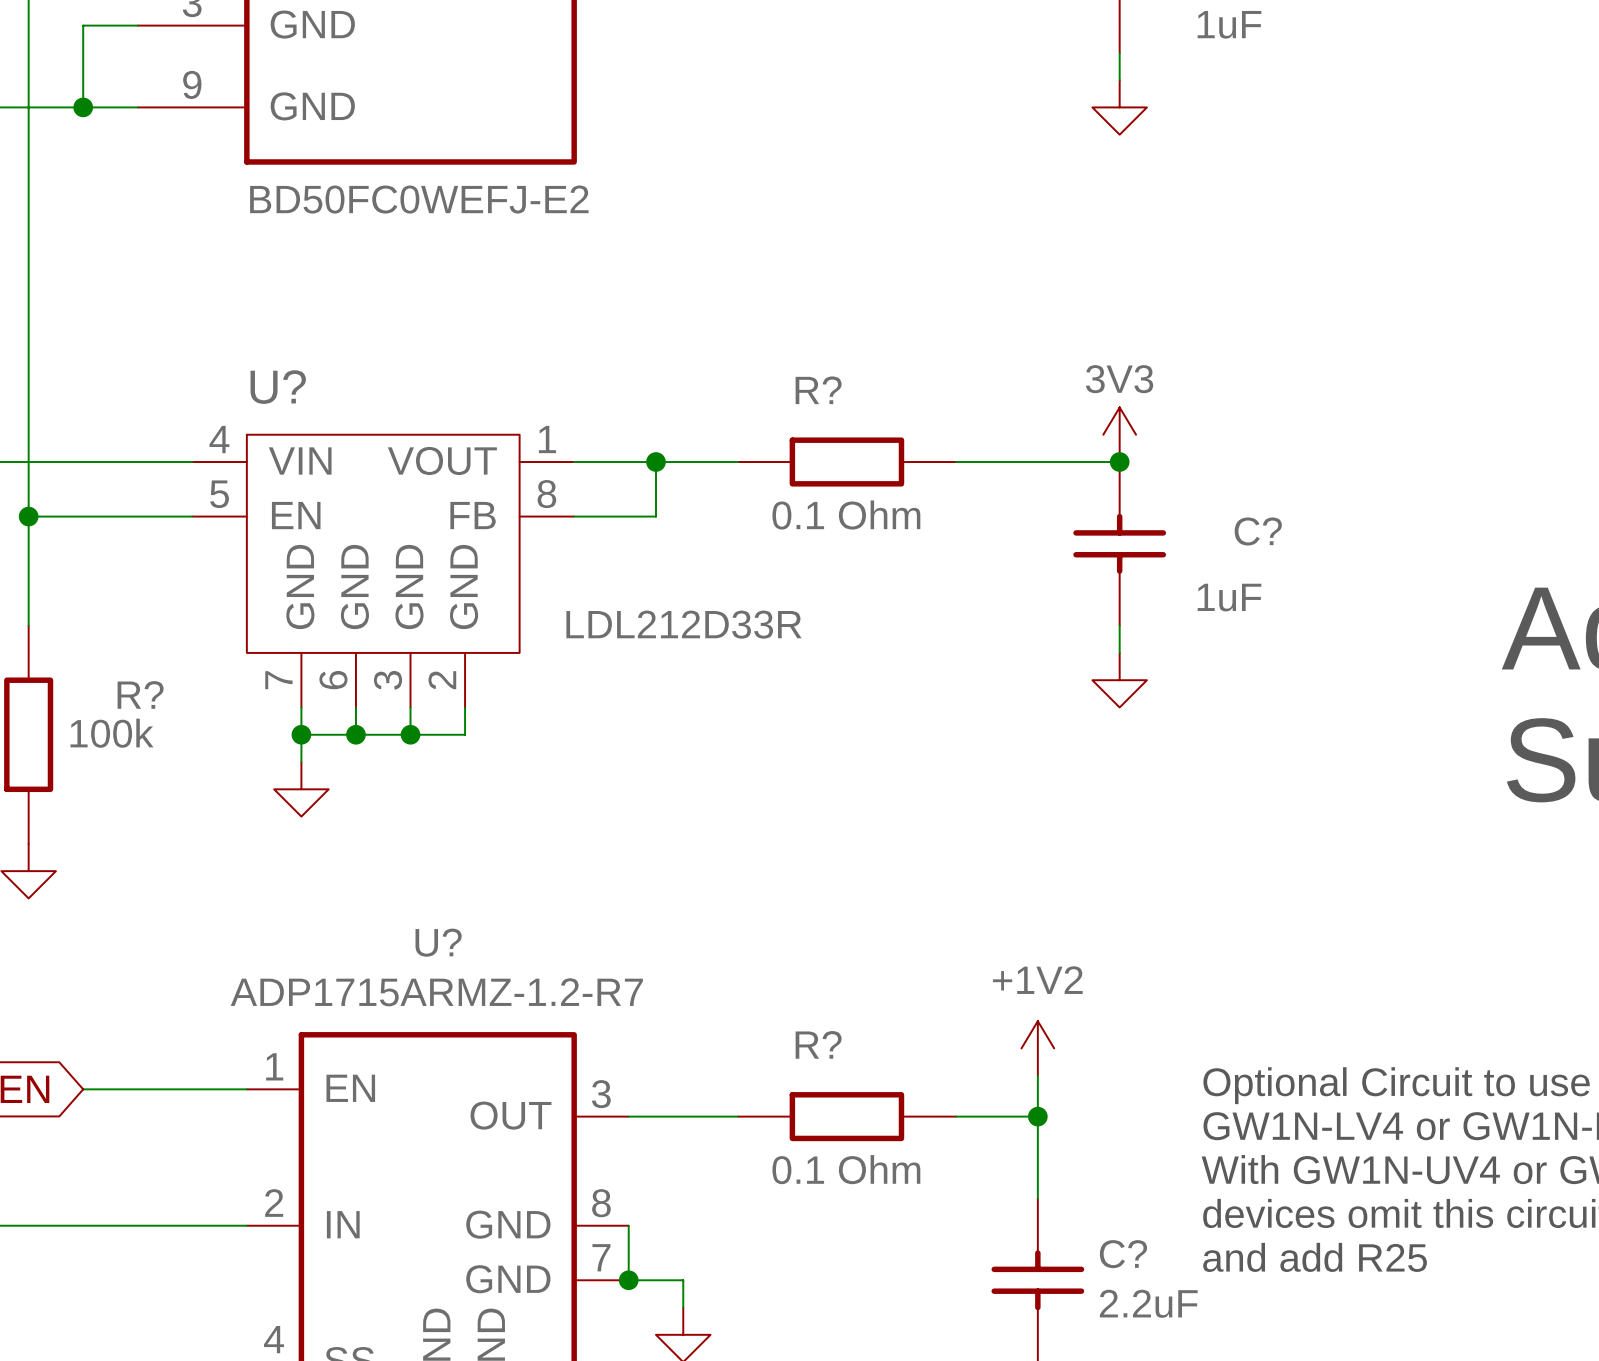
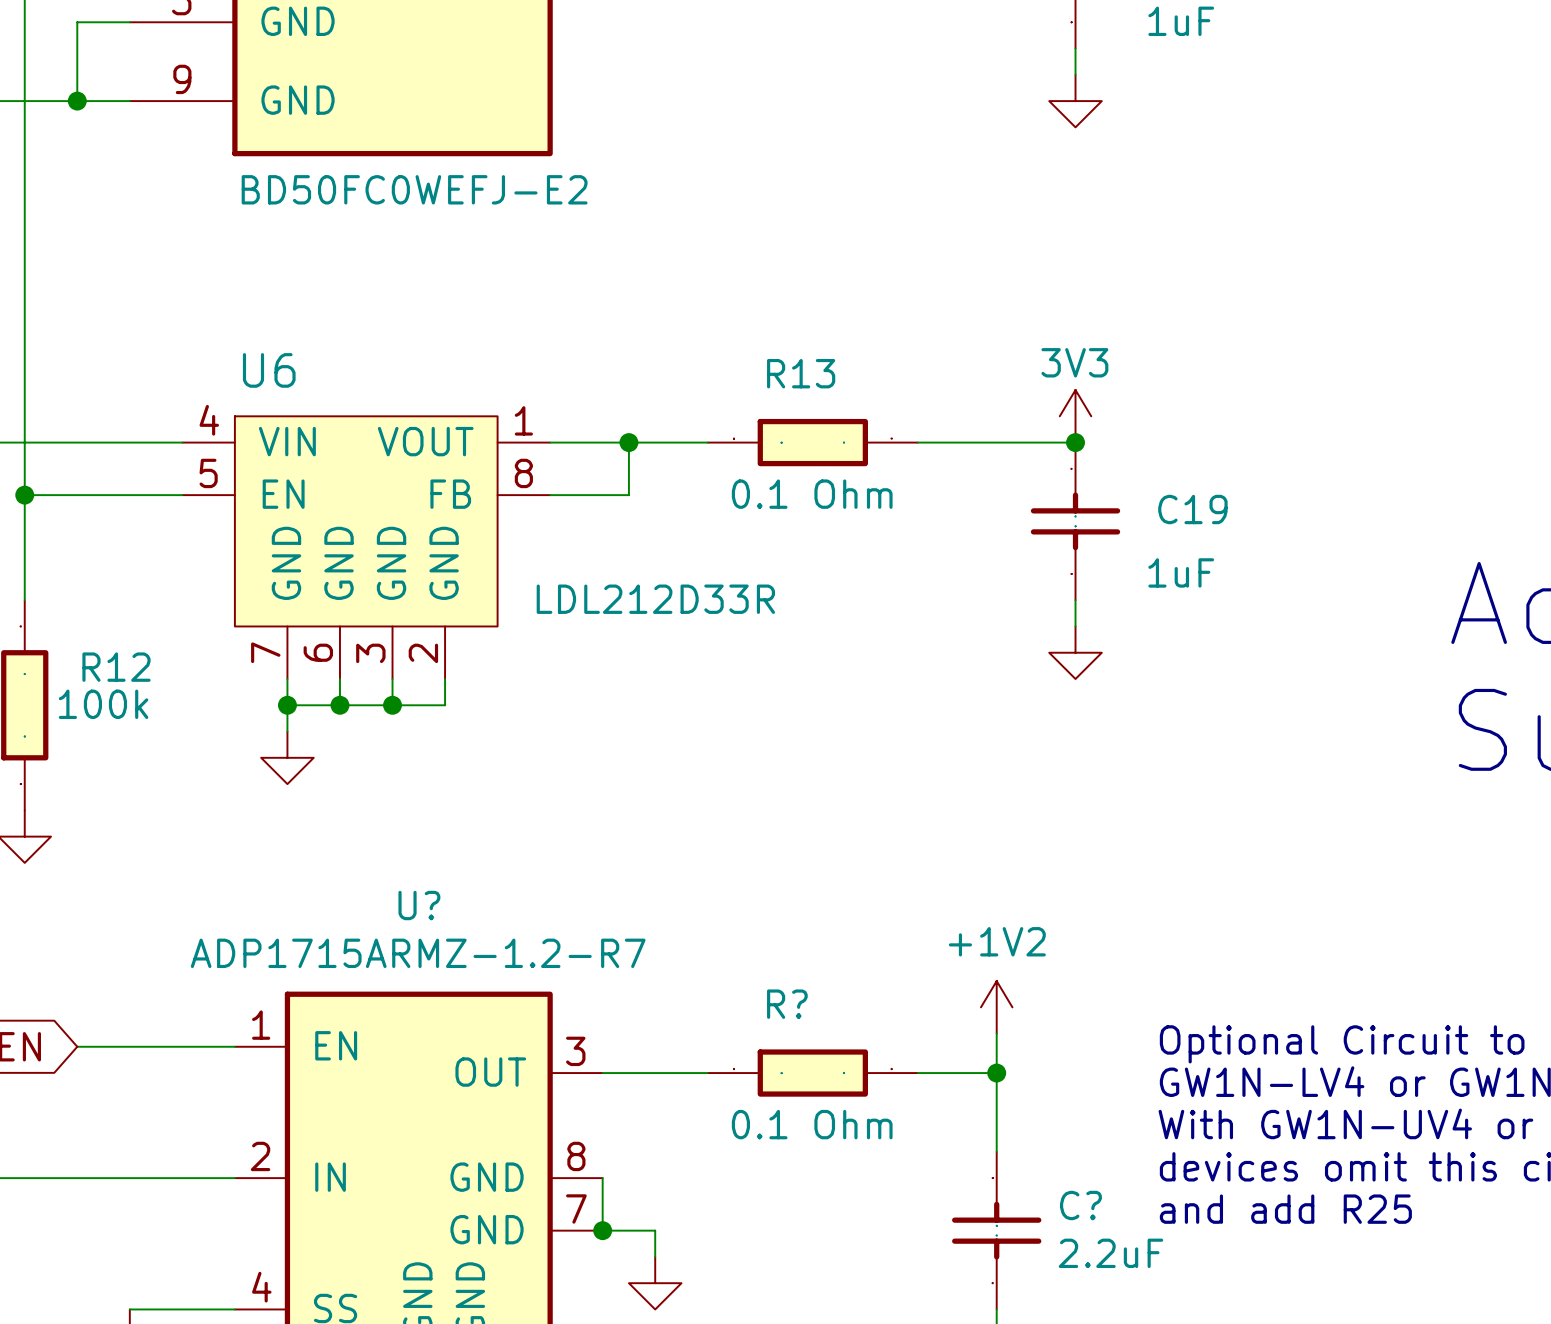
U? name: U? (278, 387) -> U6 (269, 370)
R? name: R? (818, 390) -> R13 (801, 373)
C? name: C? (1258, 531) -> C19 (1192, 509)
R? name: R? (140, 694) -> R12 (116, 667)

